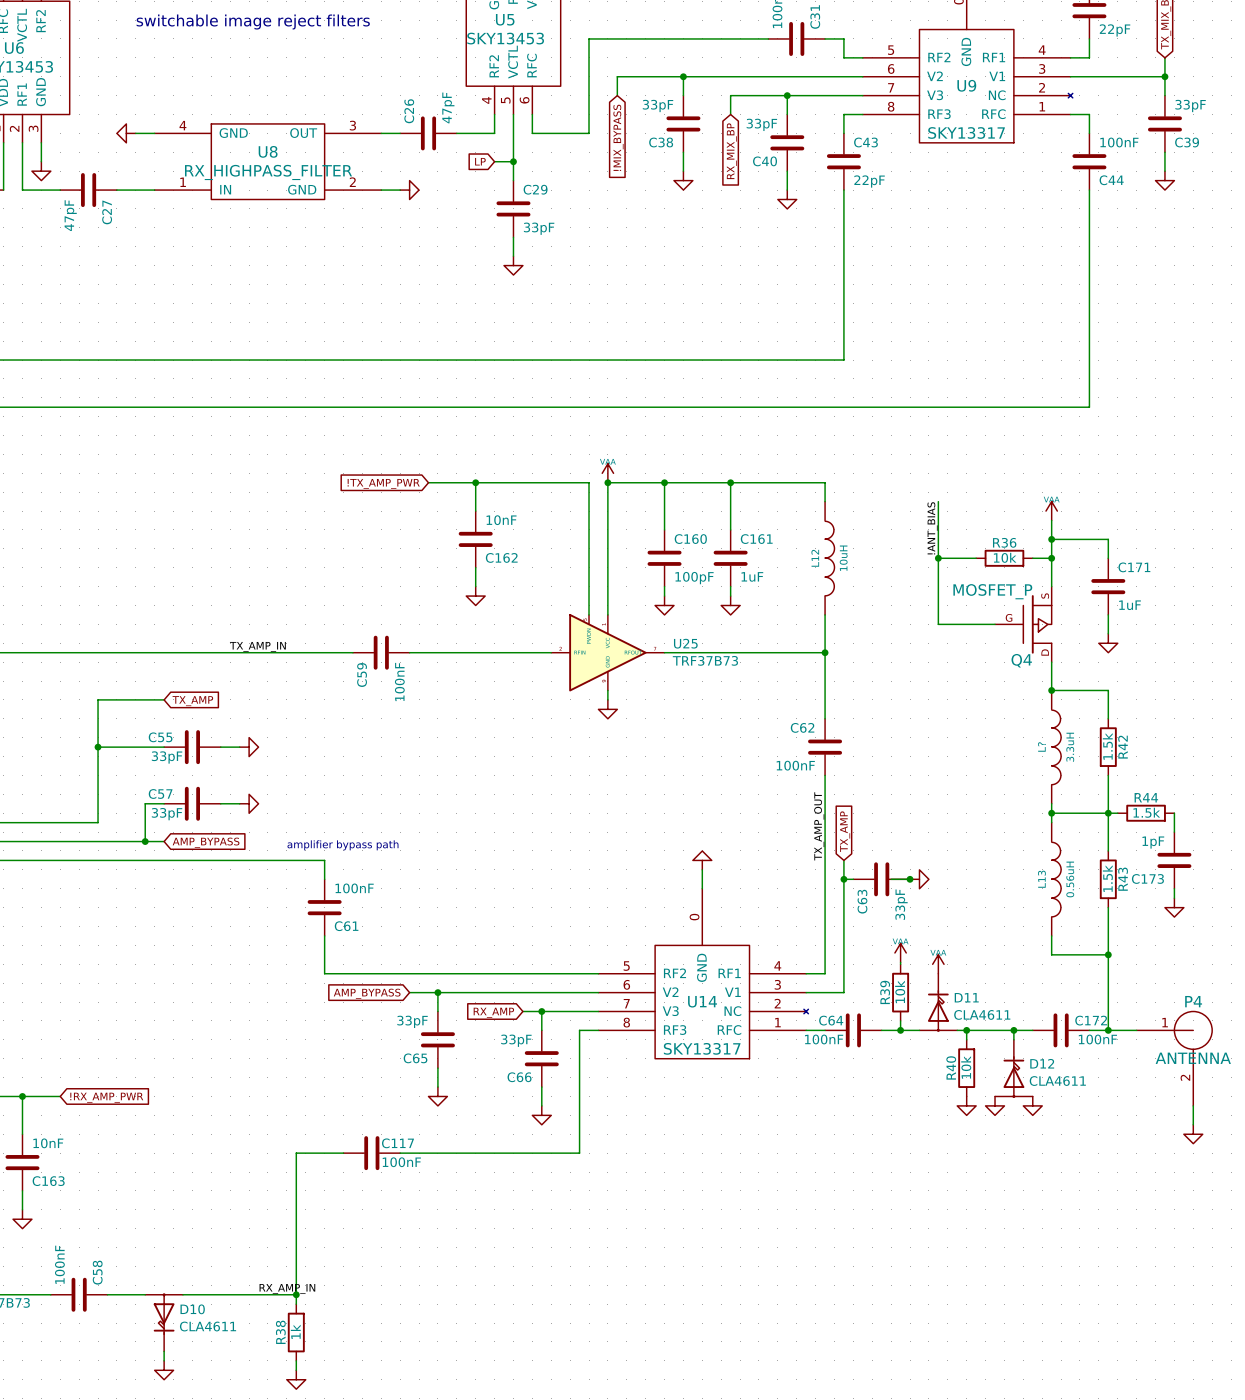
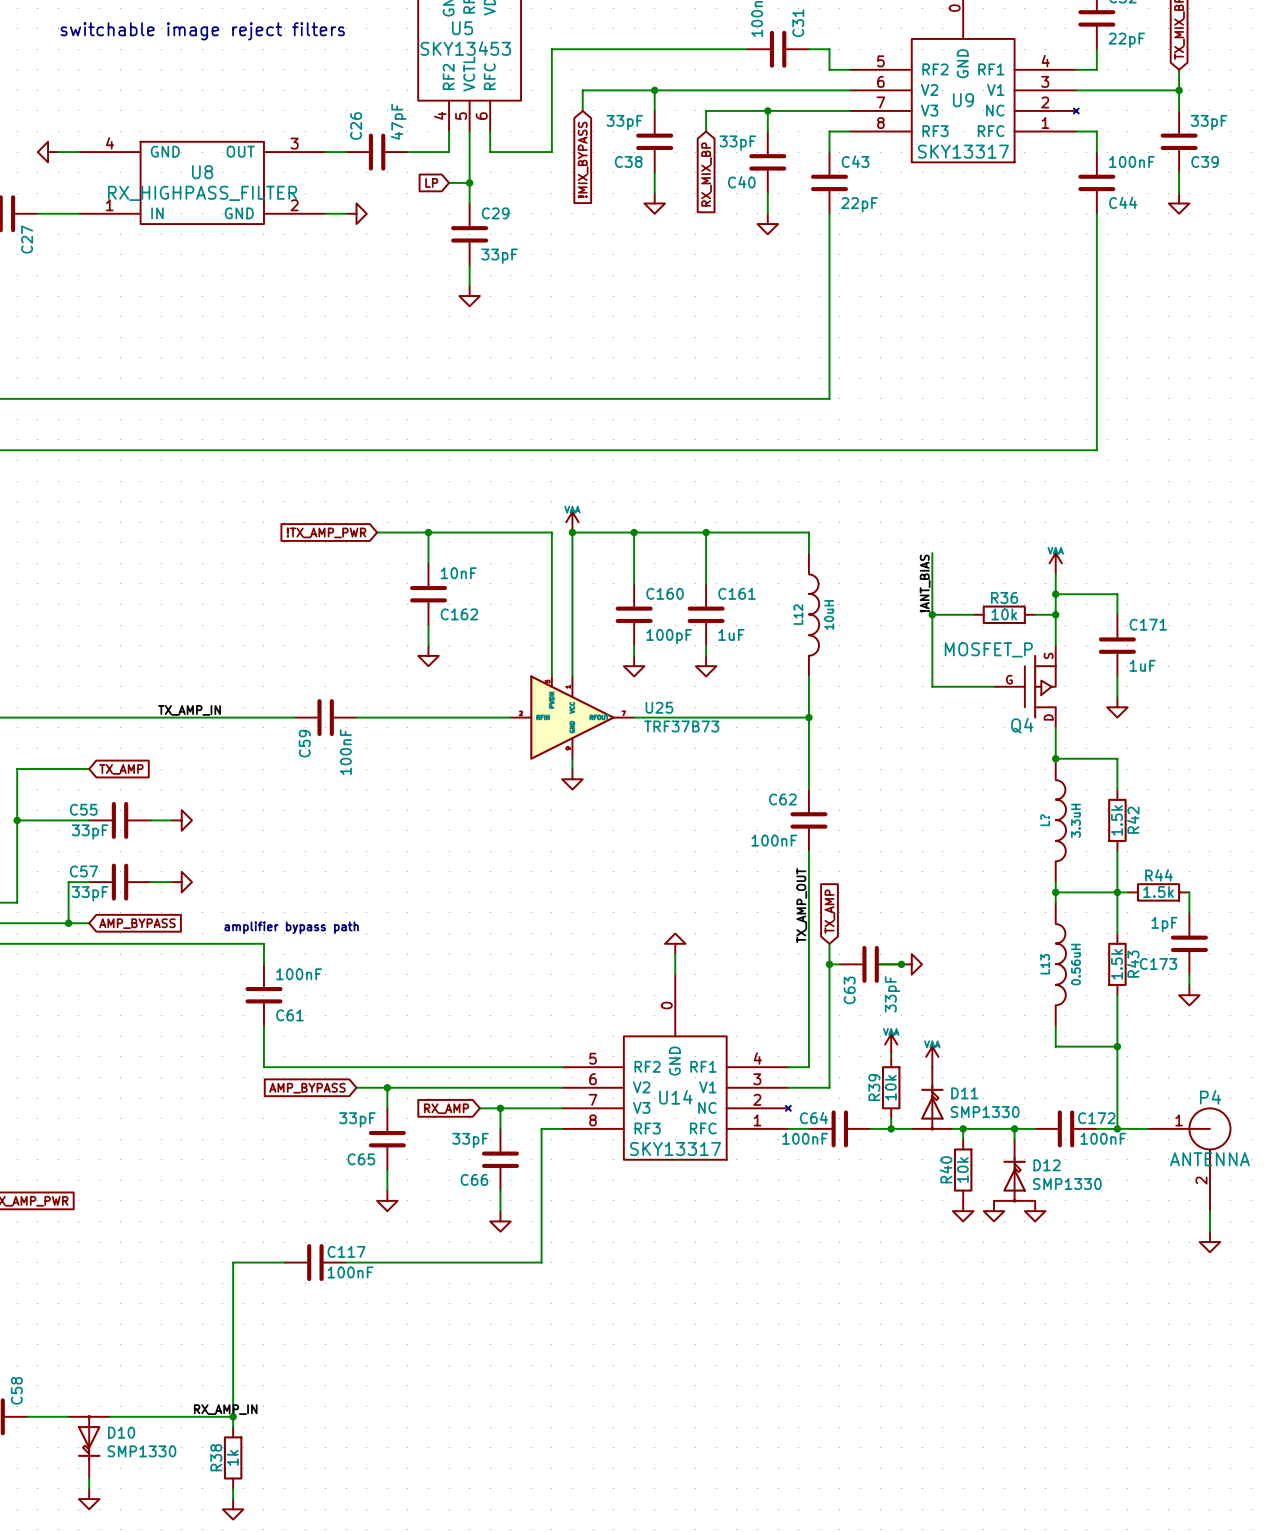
D11 value: CLA4611 (982, 1014) -> SMP1330 (985, 1112)
D12 value: CLA4611 (1057, 1081) -> SMP1330 (1067, 1184)
D10 value: CLA4611 (208, 1326) -> SMP1330 (141, 1451)

